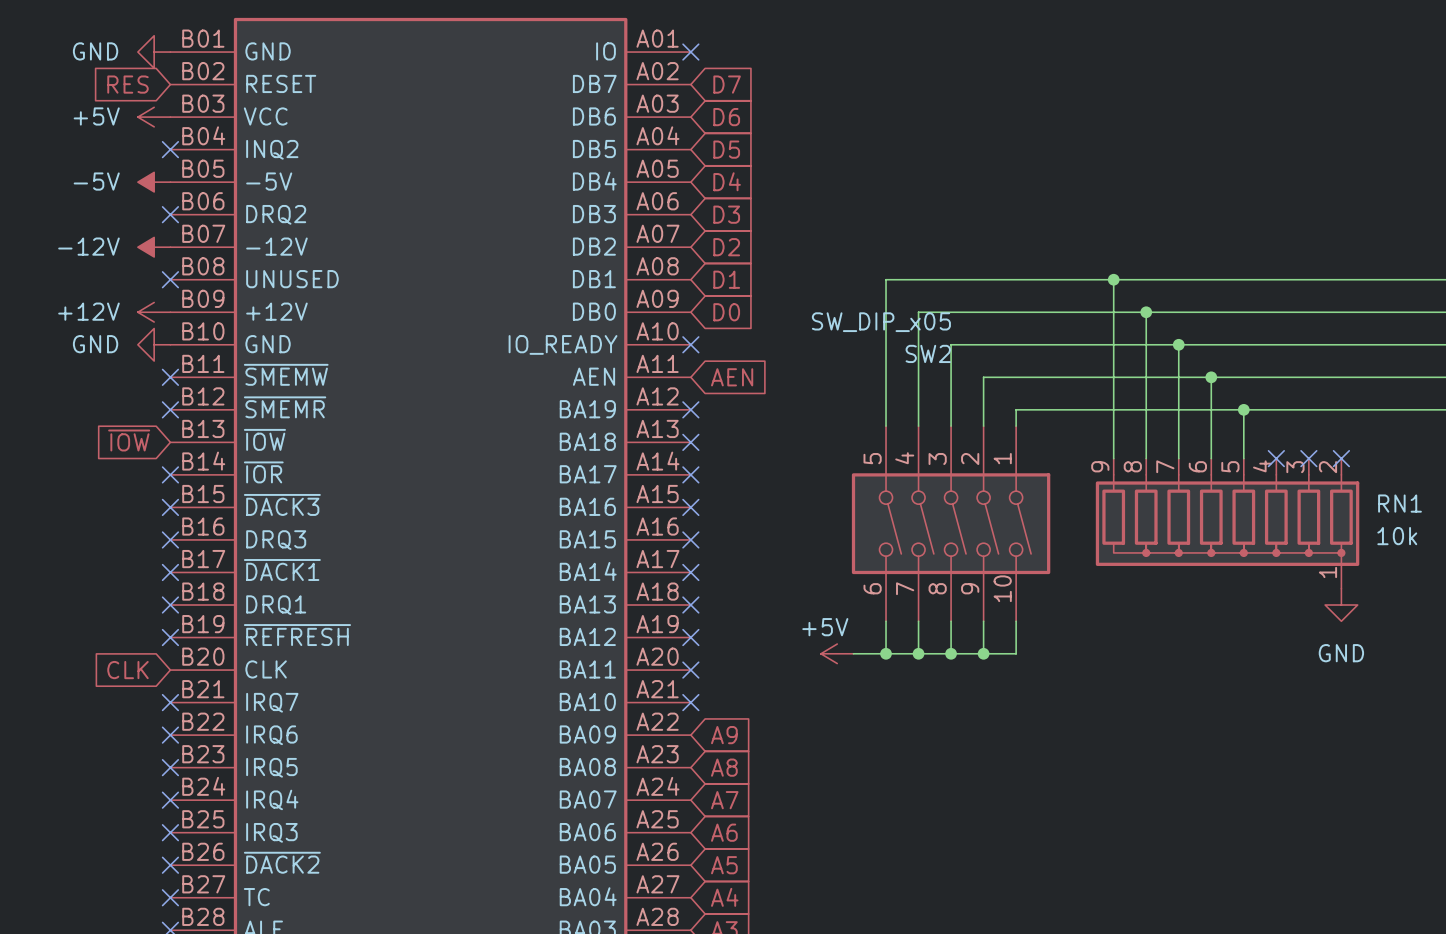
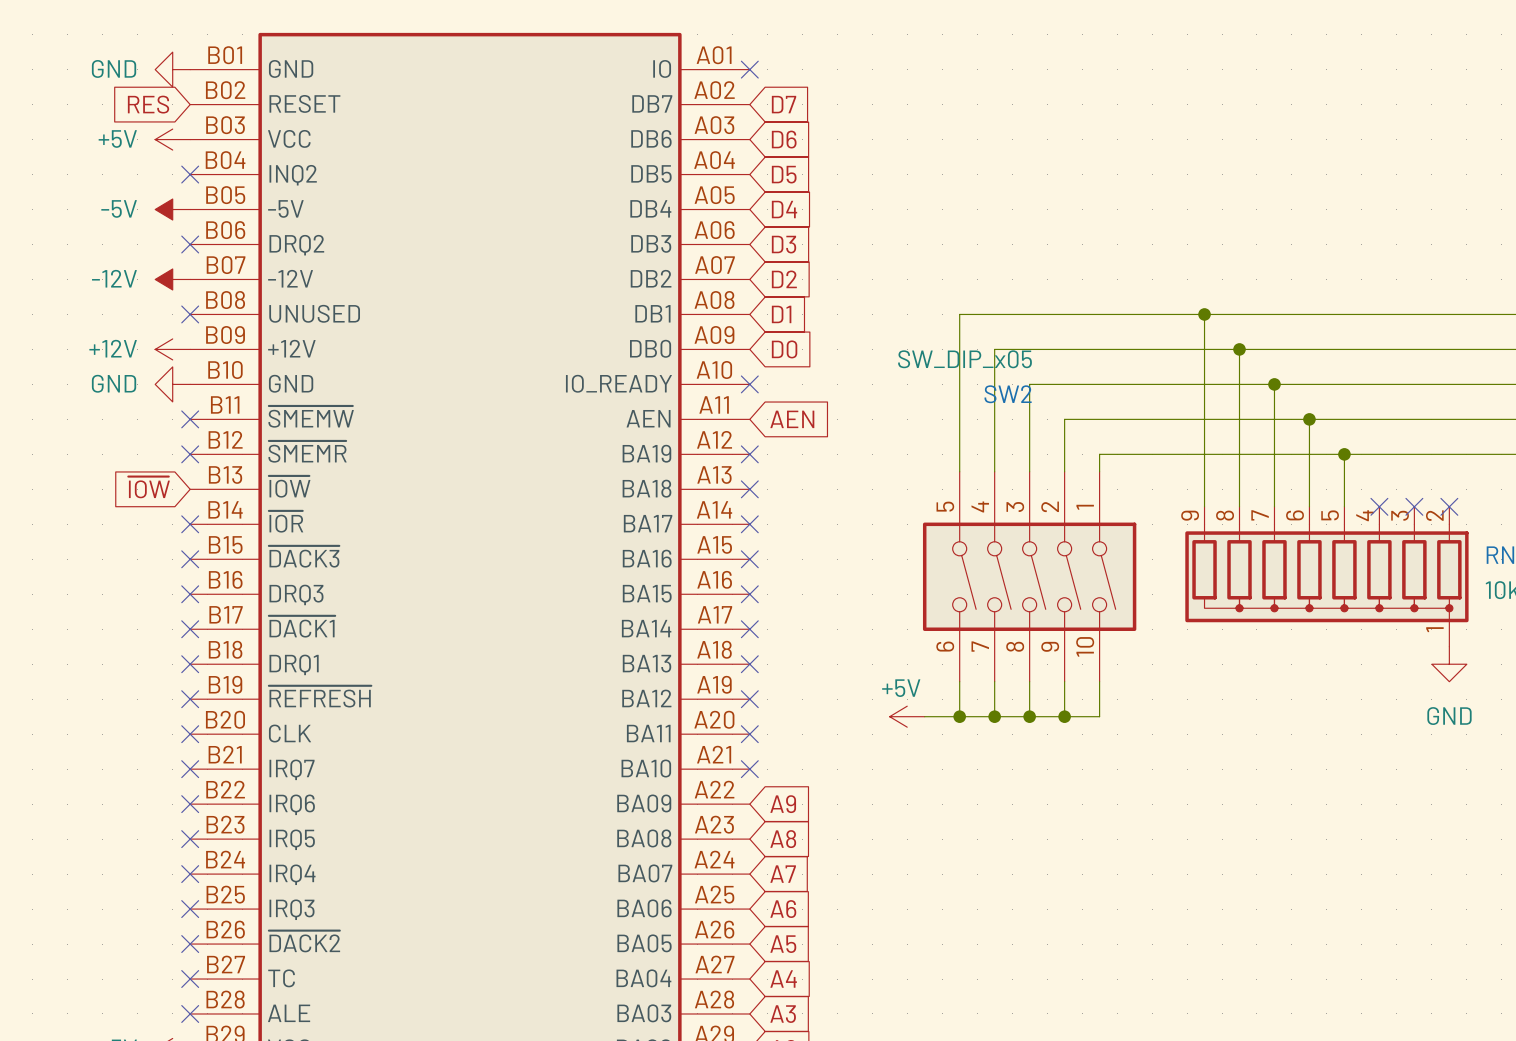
global label: CLK (127, 670) -> none
no-connect mark: none -> (190, 734)

